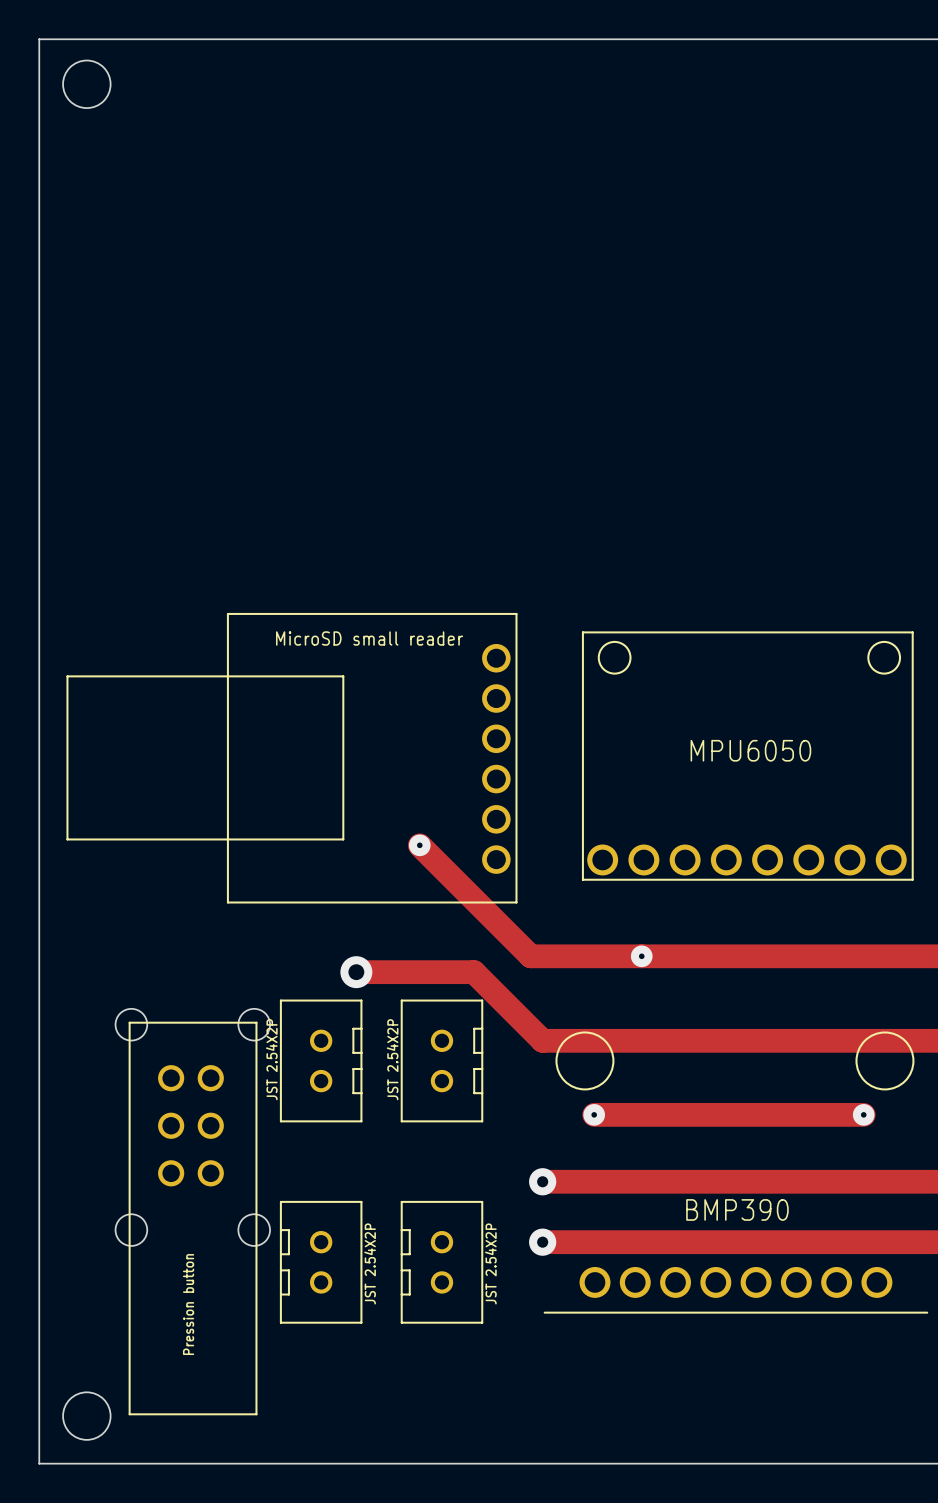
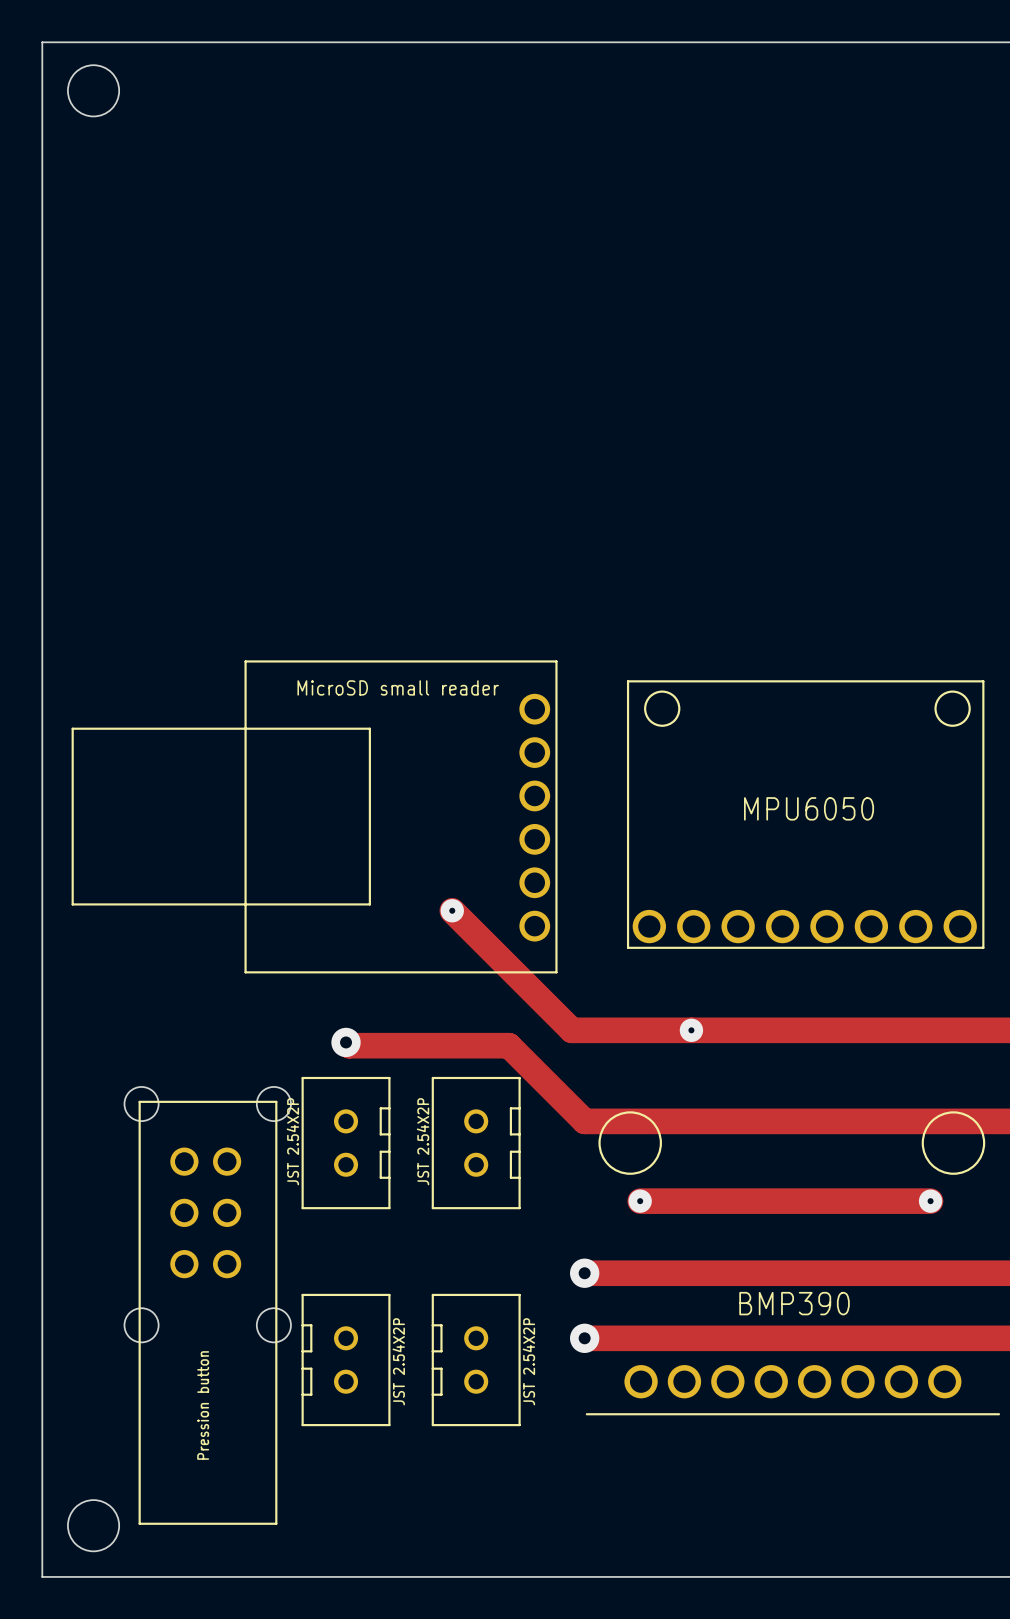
via: none -> (346, 1042)
track: (356, 972) (474, 972) -> (346, 1042) (349, 1045) (508, 1045) (510, 1047)
via: (356, 972) -> none

